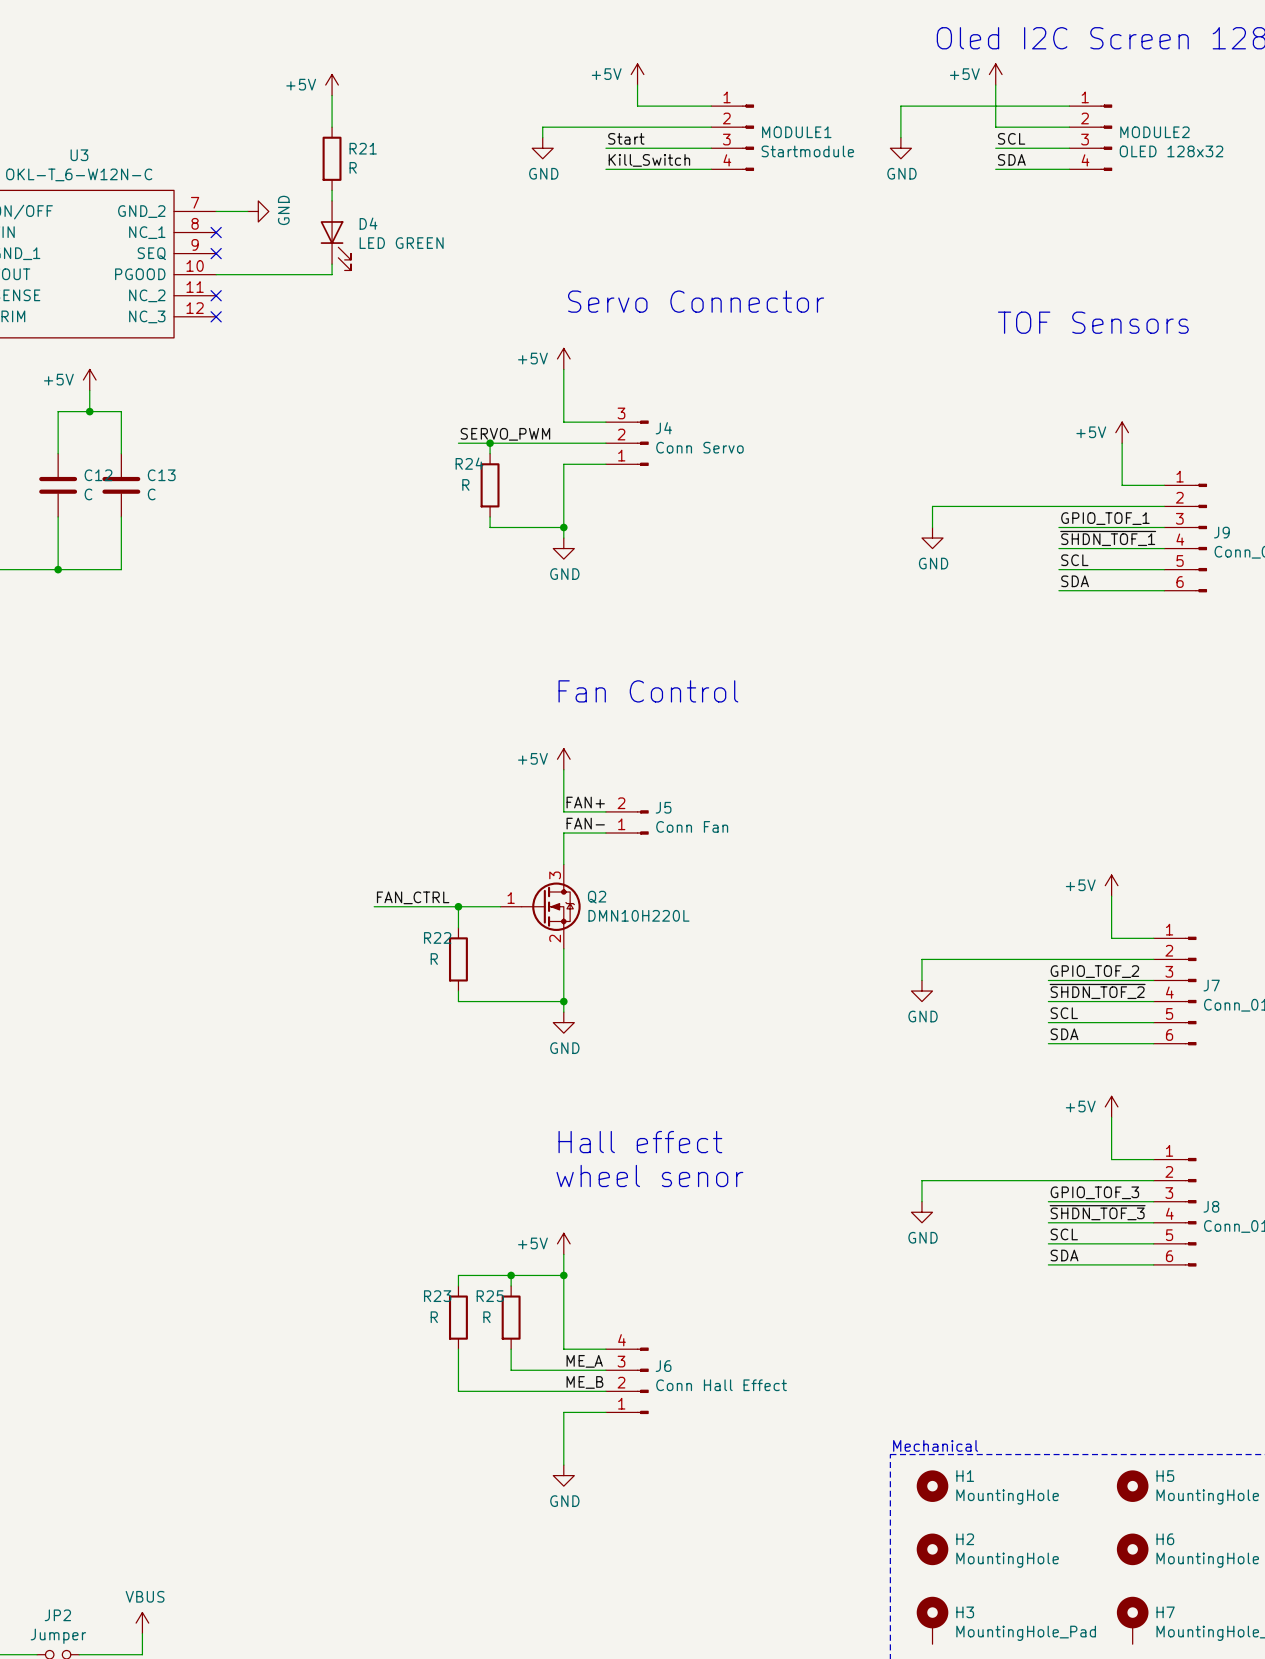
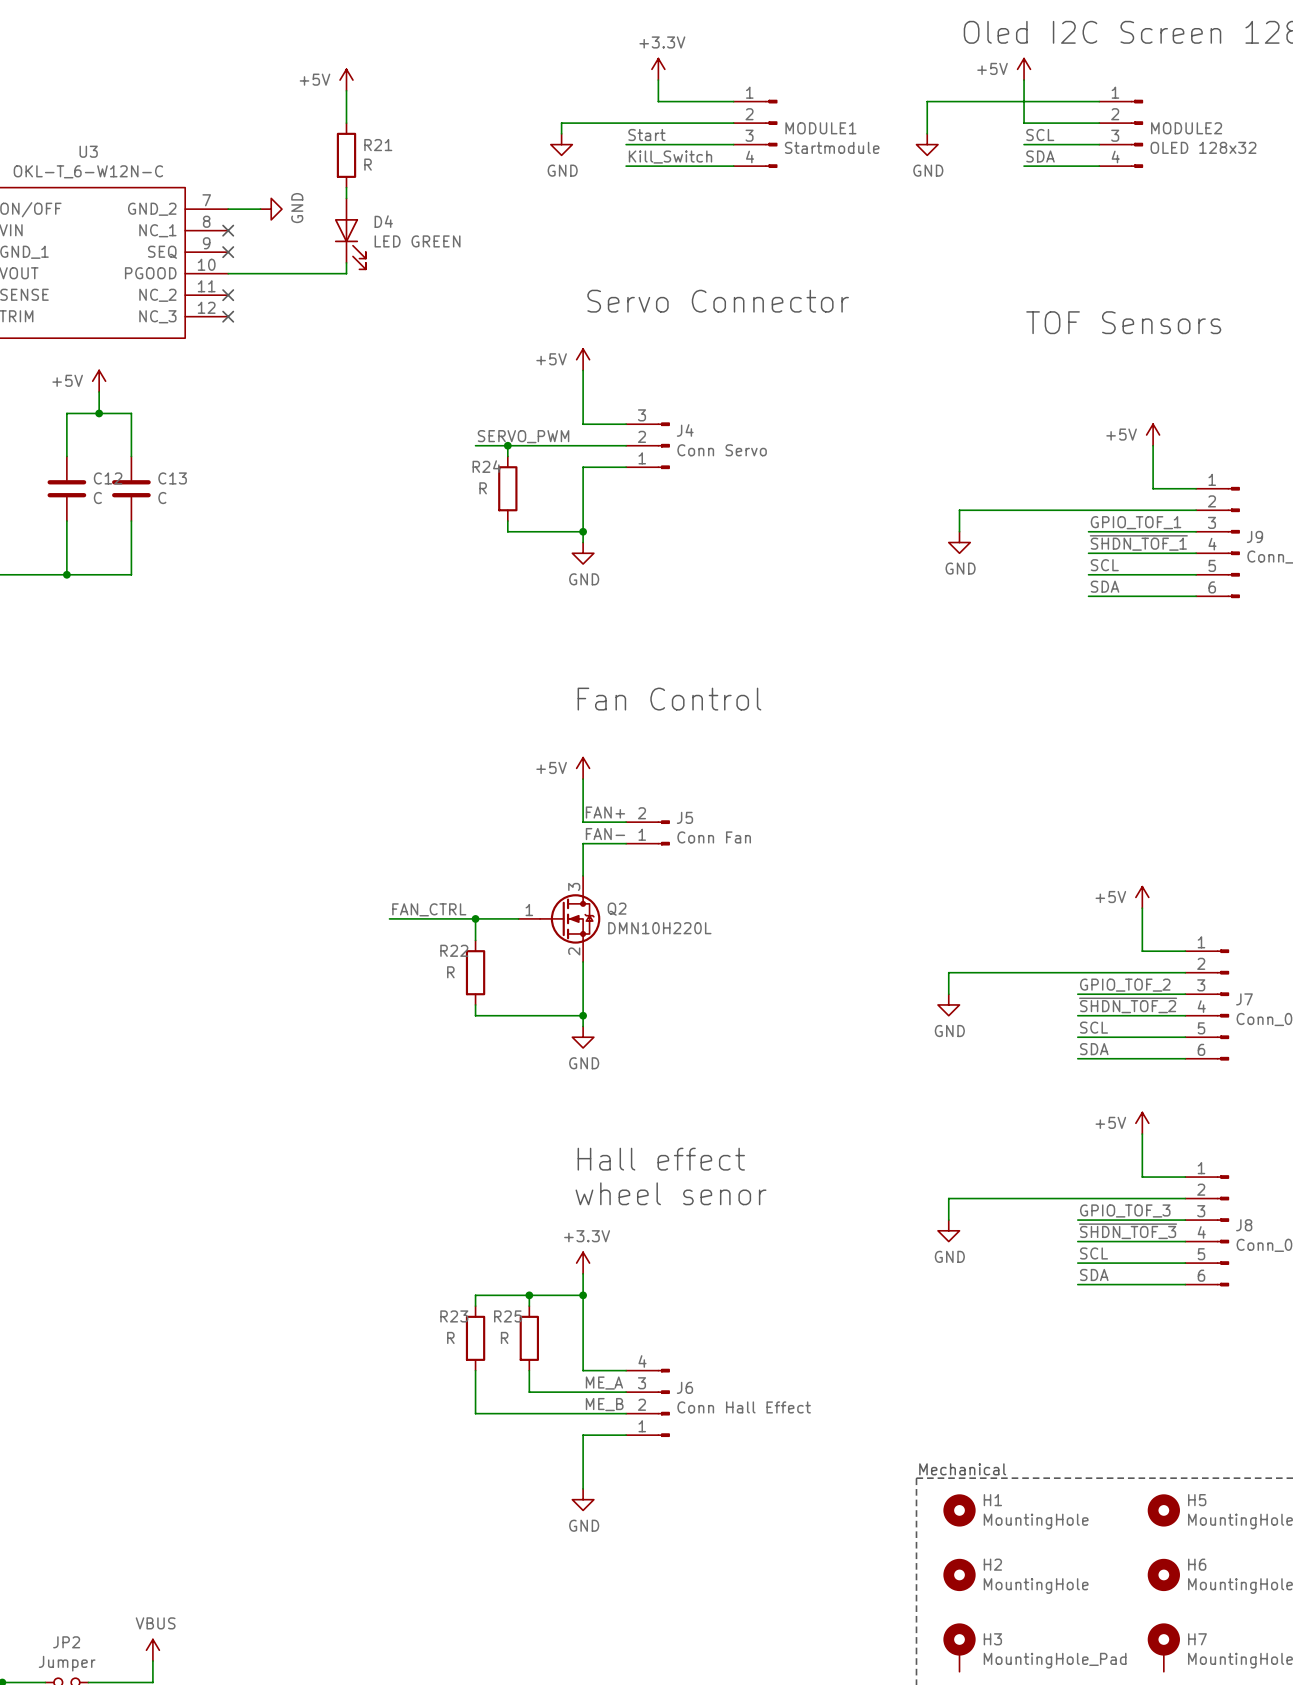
power symbol: +5V (637, 74) -> +3.3V (658, 69)
power symbol: +5V (563, 1243) -> +3.3V (583, 1263)

